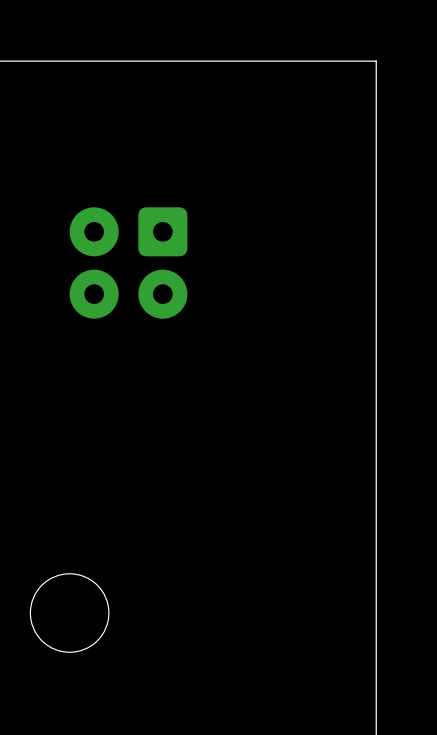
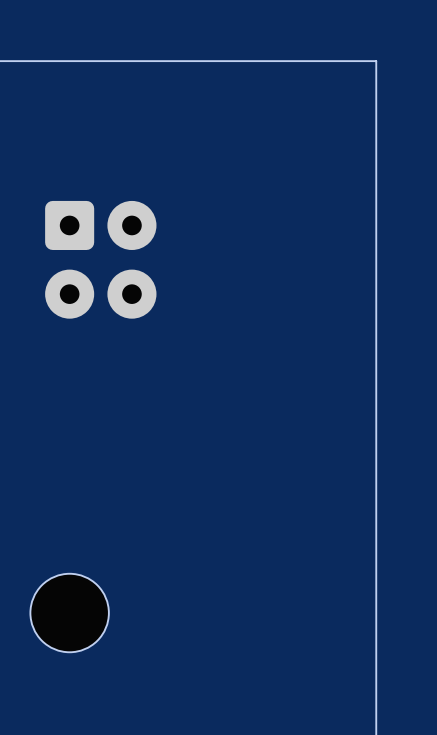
part rotation: 0° (128, 262) -> 90° counterclockwise (100, 259)

